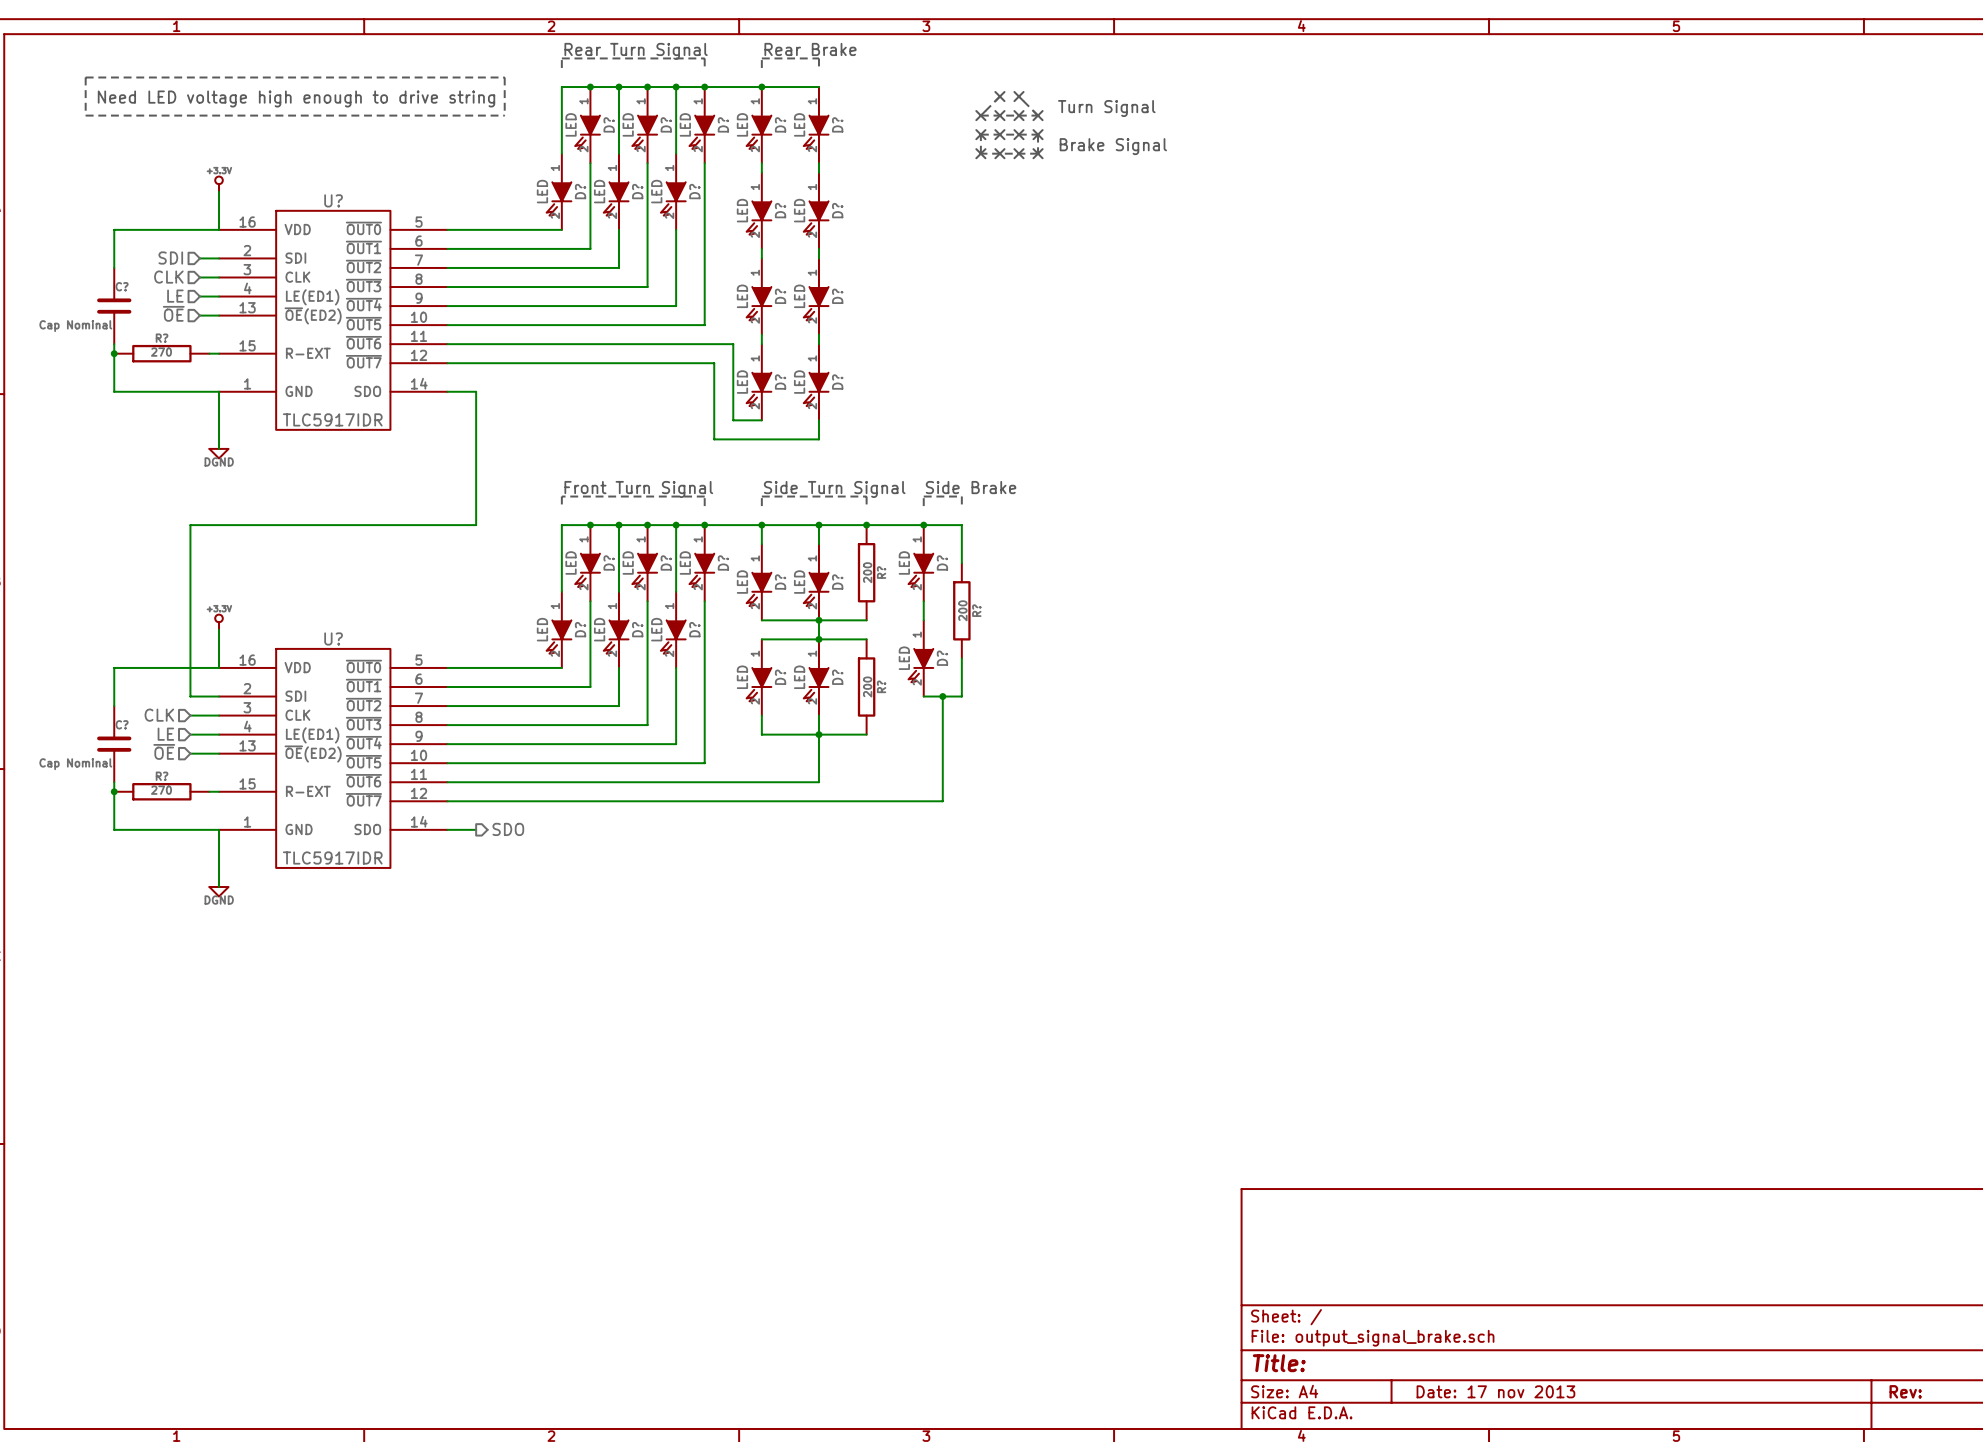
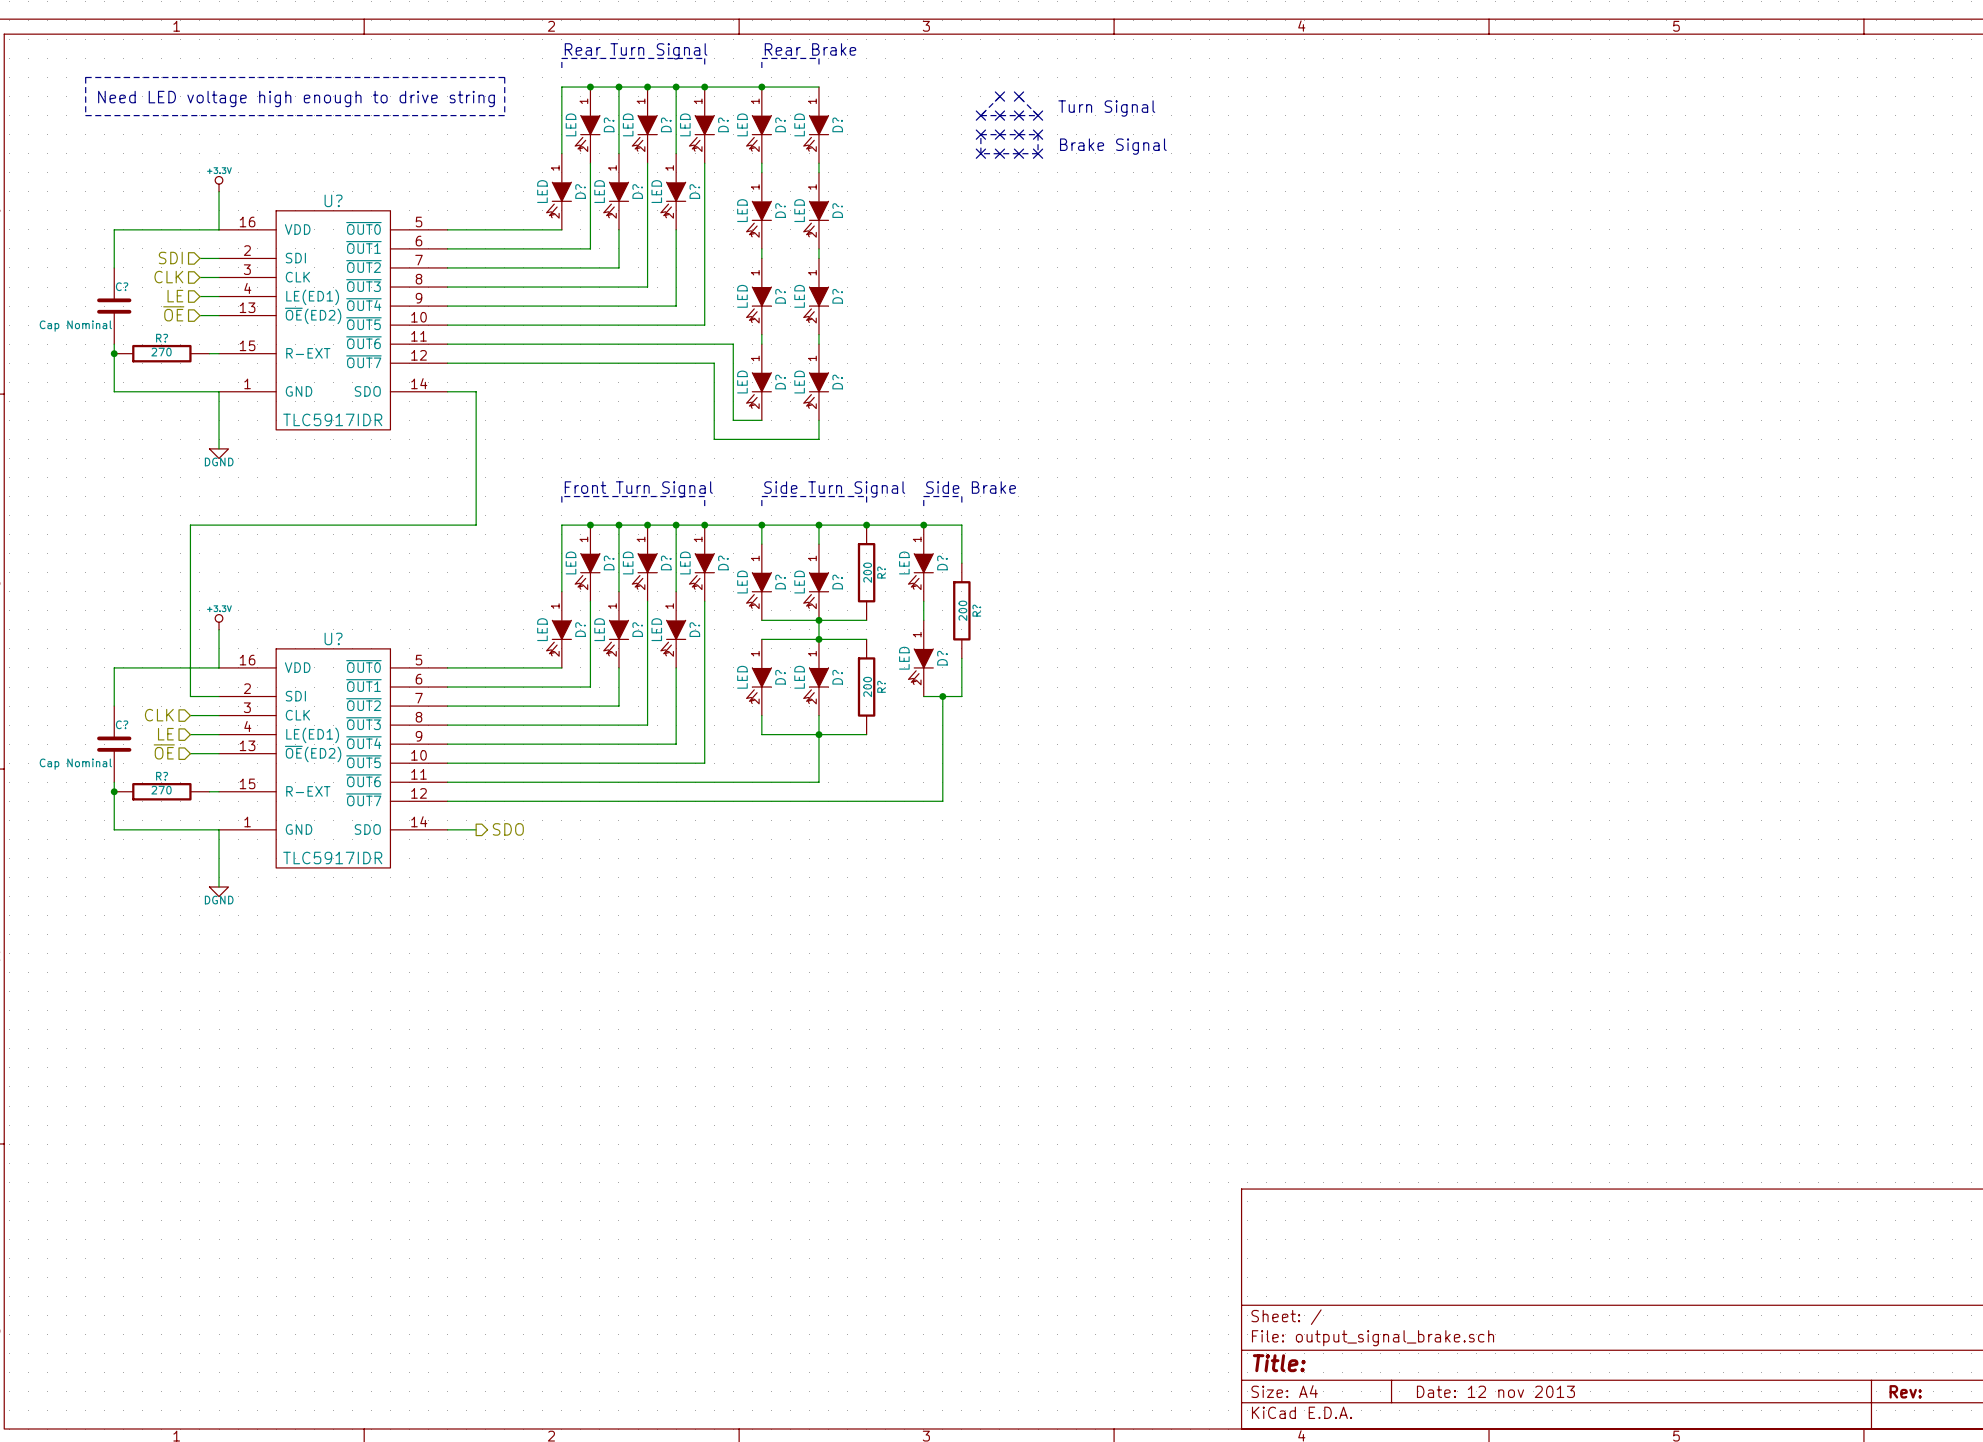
title block: Date: 17 nov 2013 (1495, 1391) -> Date: 12 nov 2013 (1495, 1391)

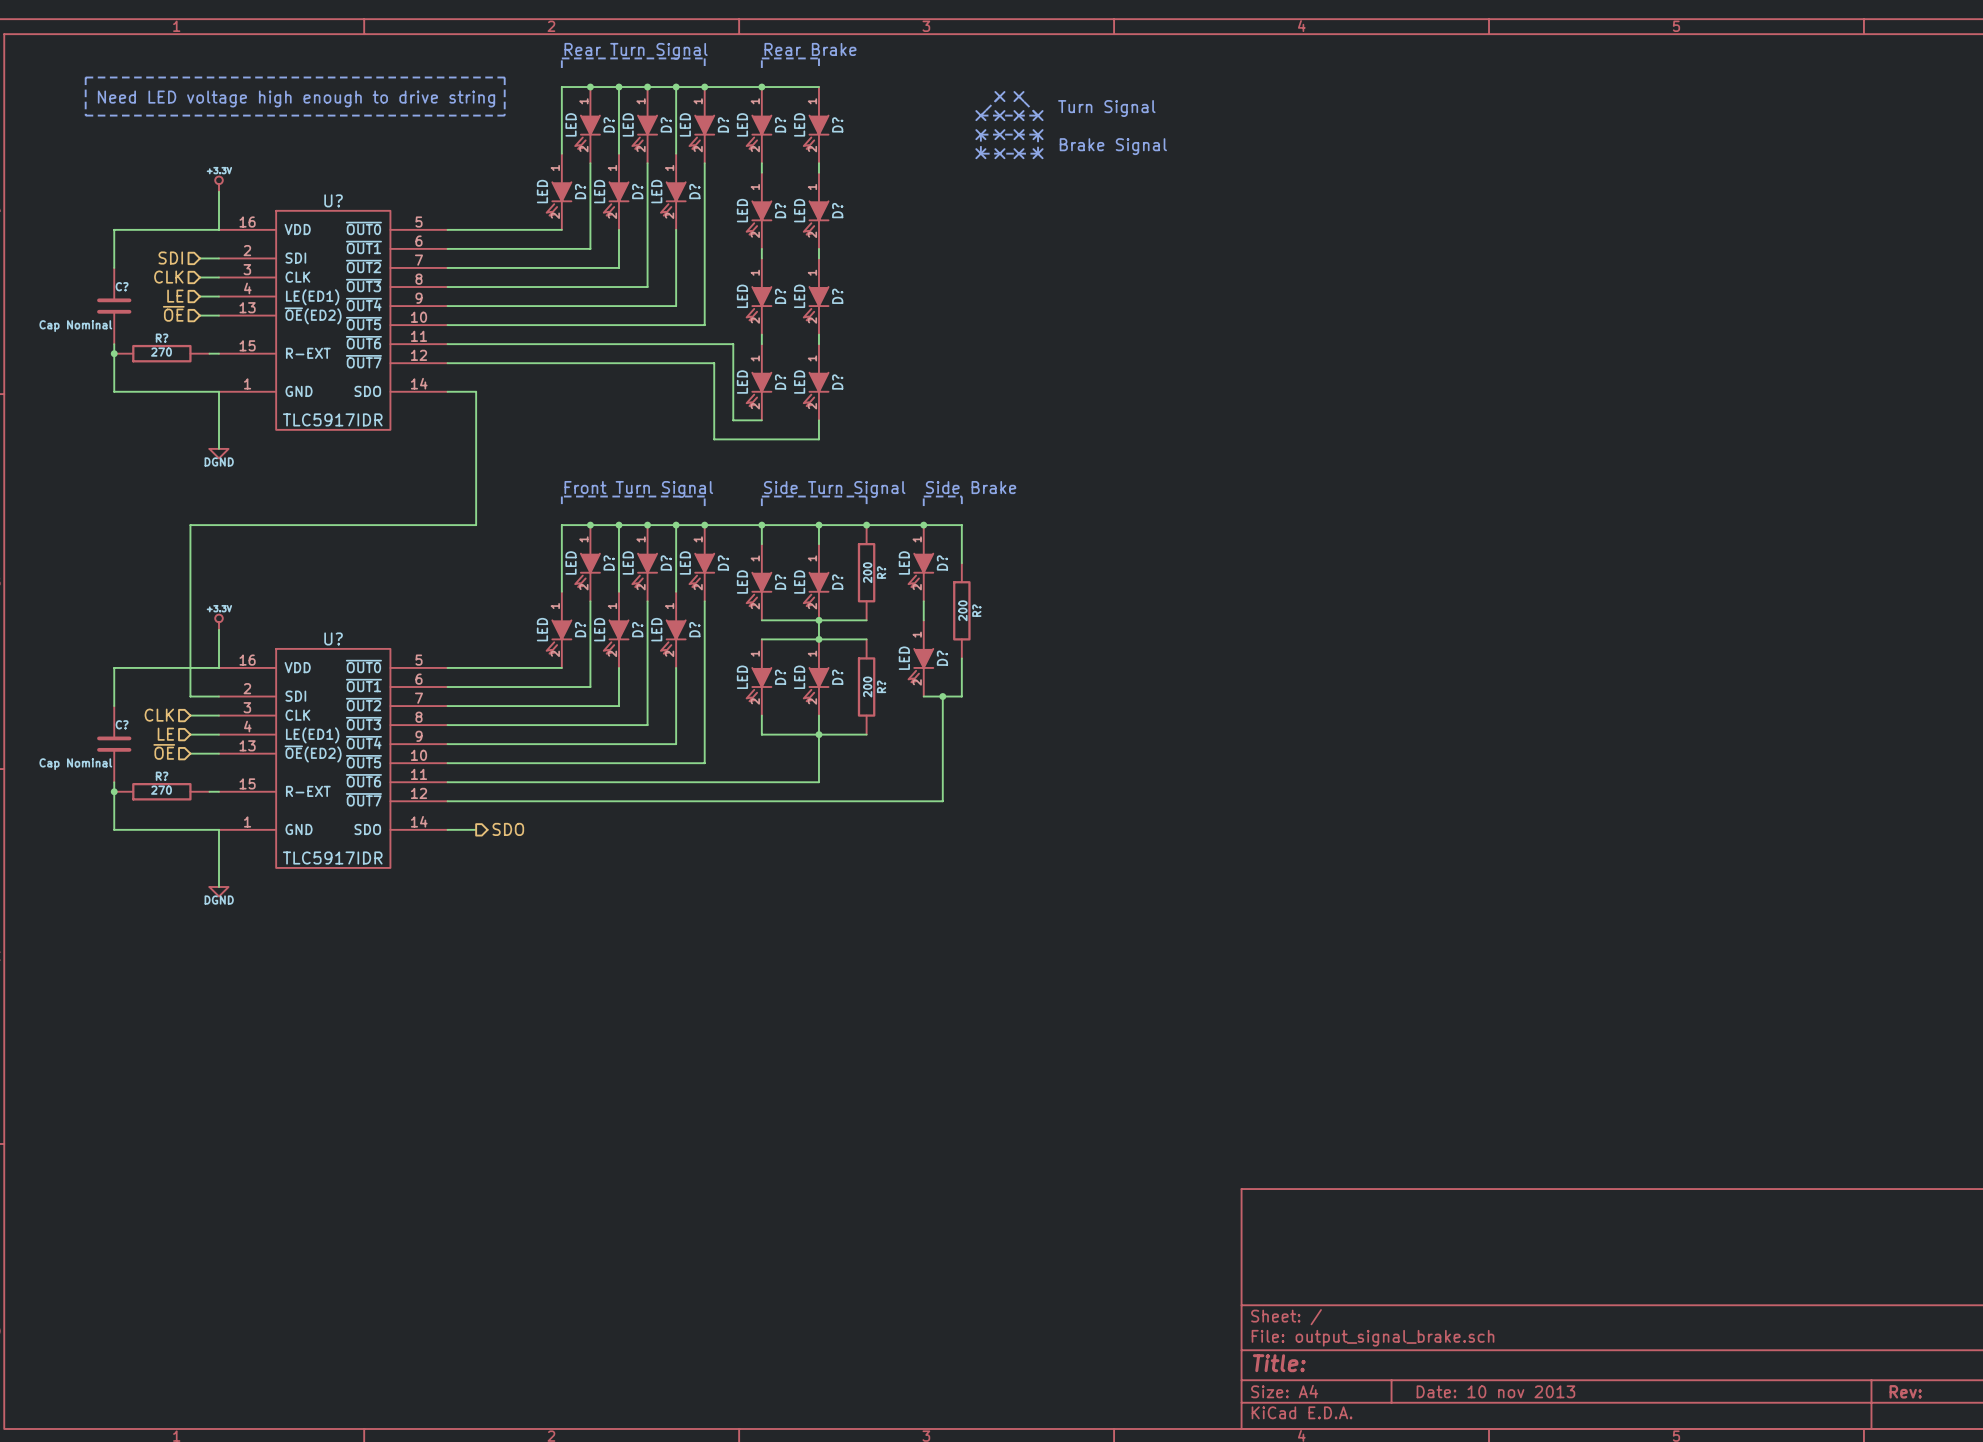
title block: Date: 12 nov 2013 (1495, 1391) -> Date: 10 nov 2013 (1495, 1391)

